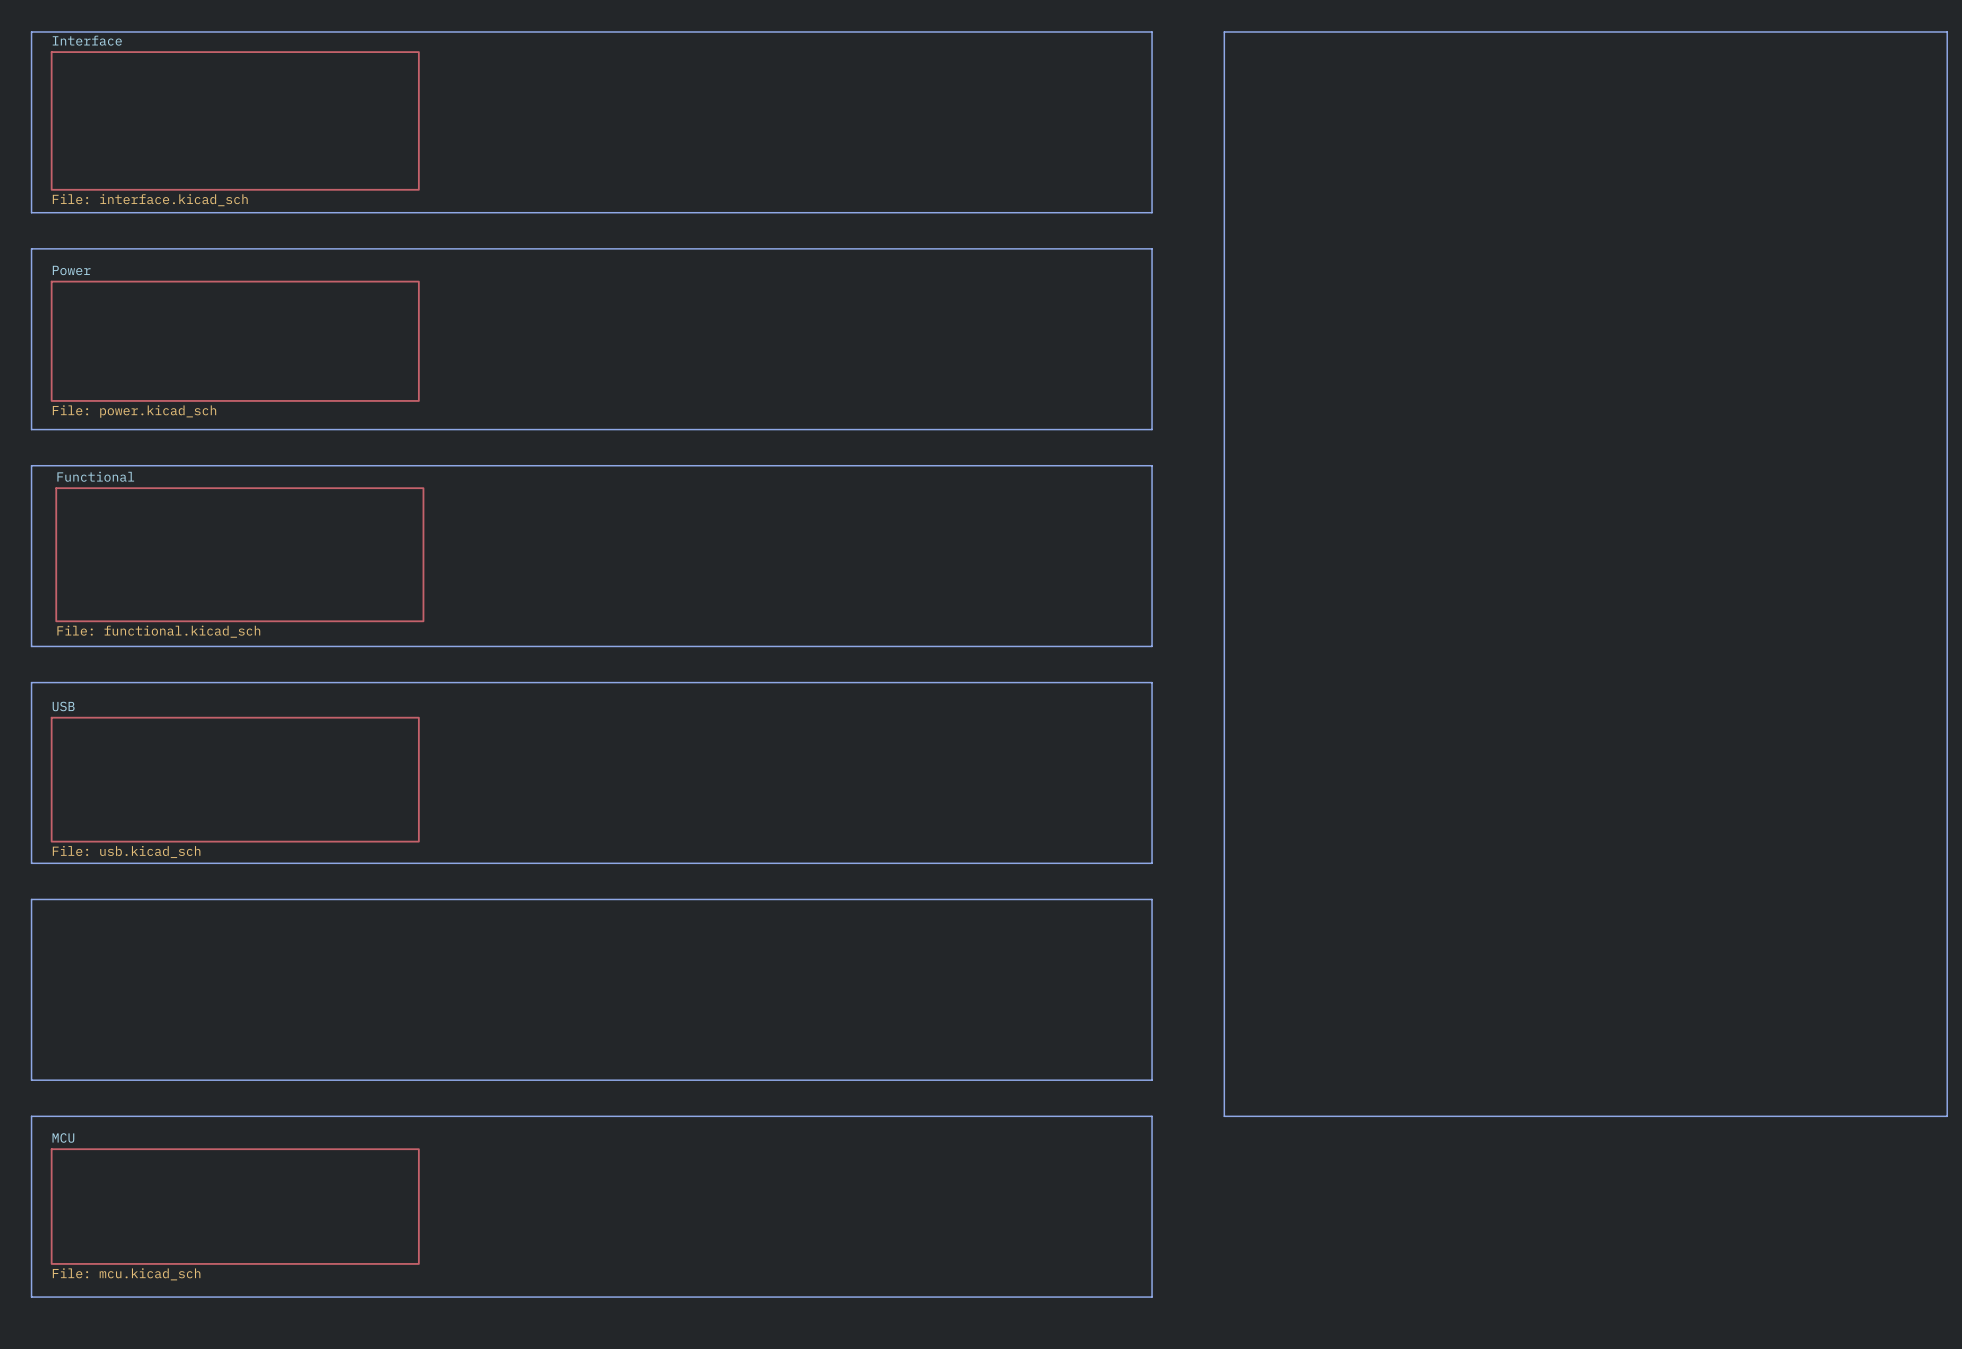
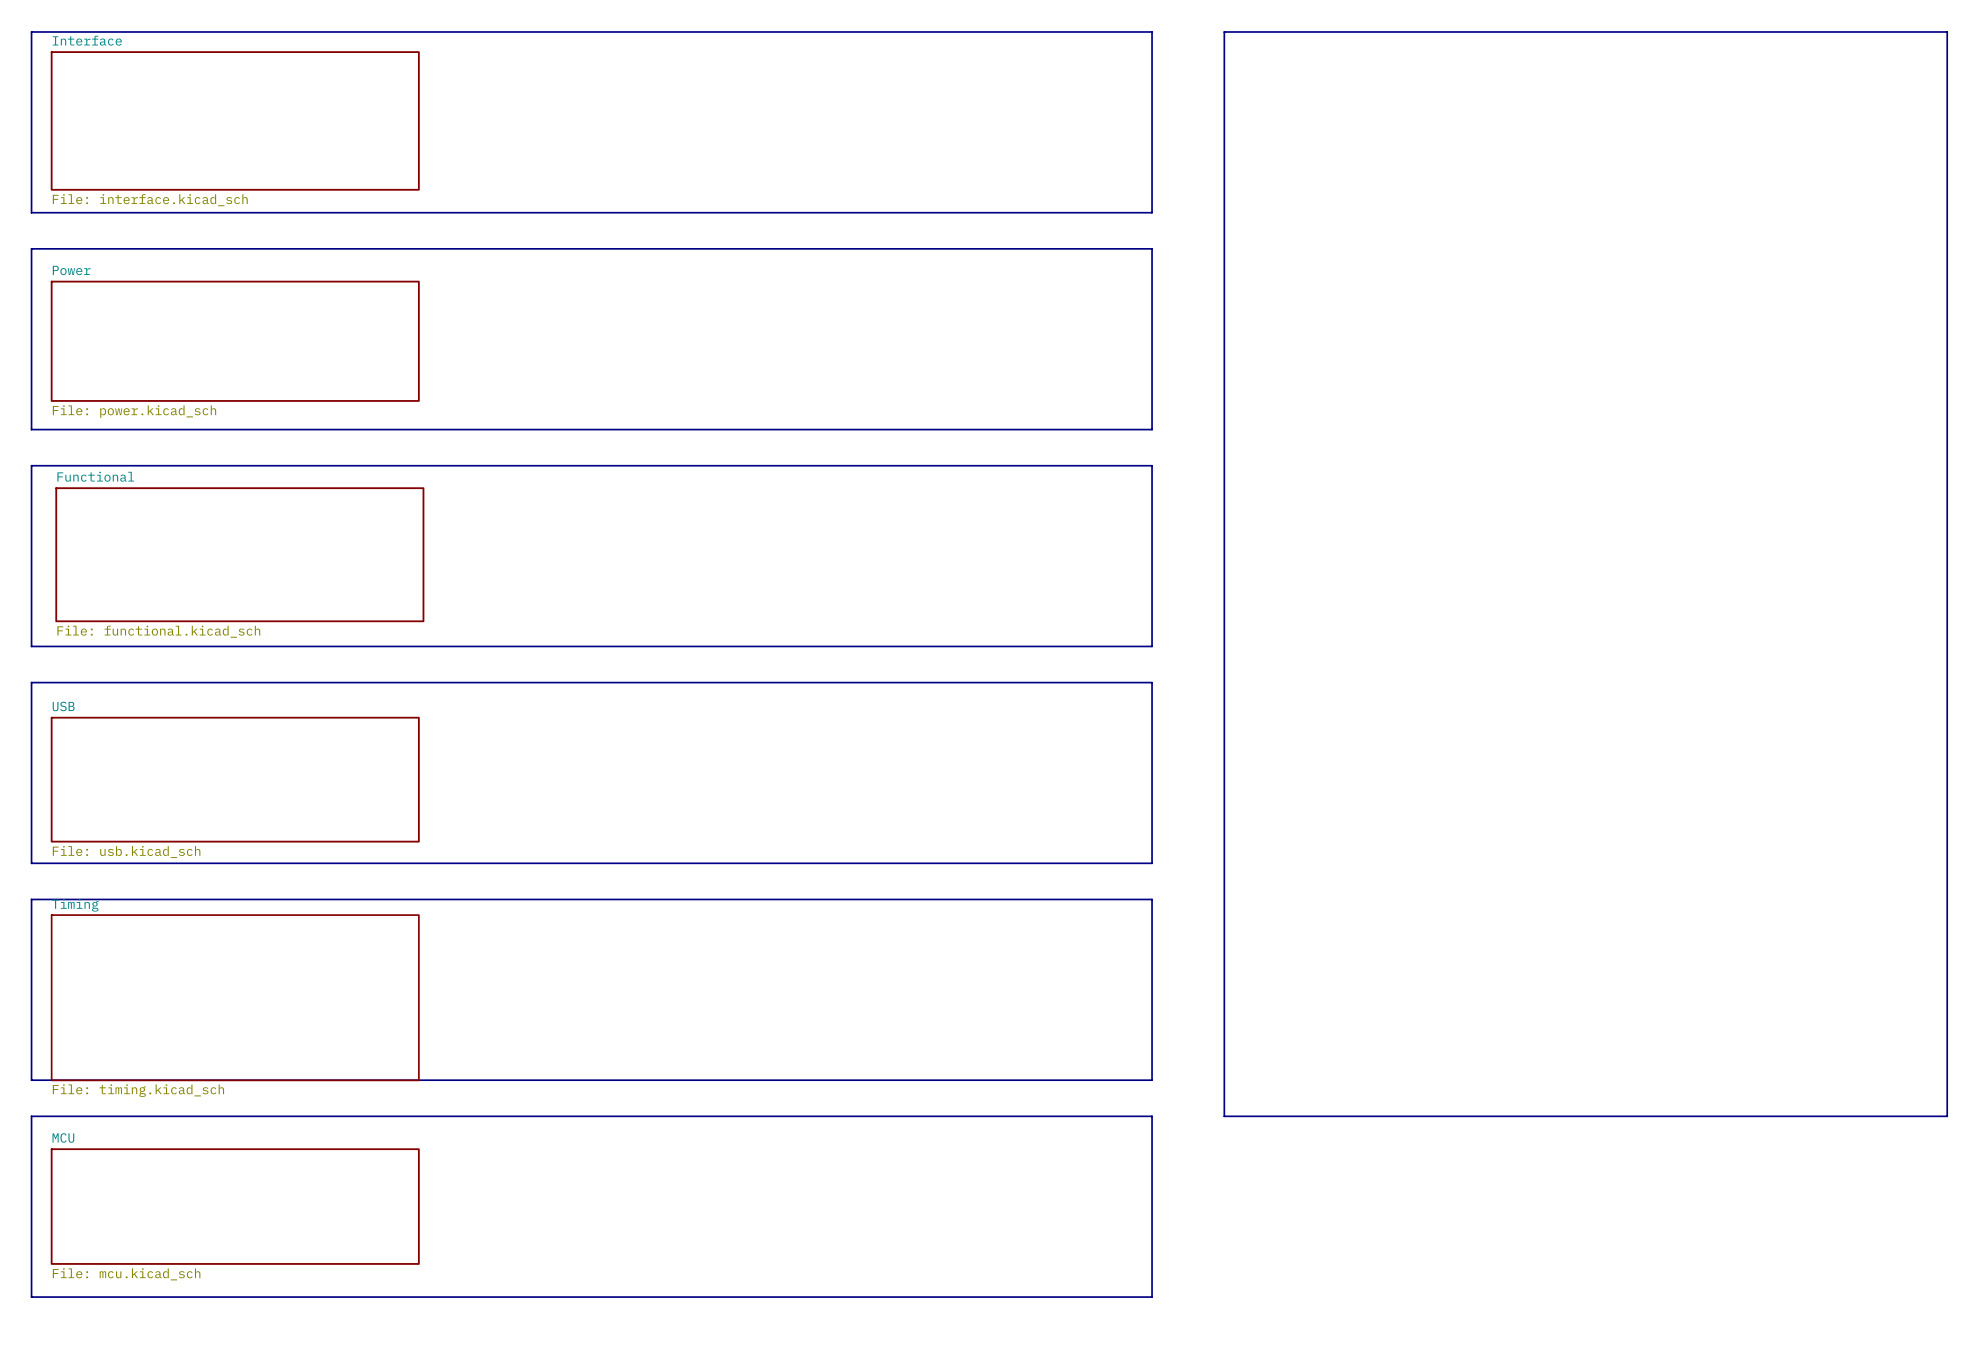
sheet Timing: none -> File: timing.kicad_sch (235, 997)

